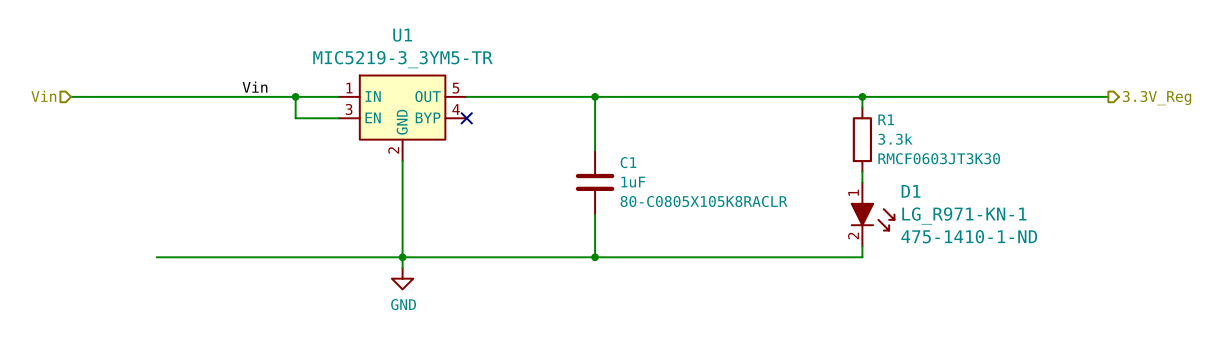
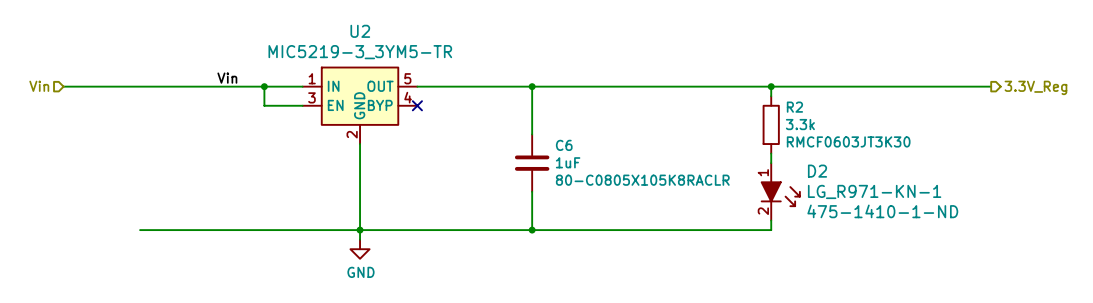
U1 name: U1 (402, 35) -> U2 (360, 31)
R1 name: R1 (886, 119) -> R2 (794, 107)
C1 name: C1 (628, 162) -> C6 (564, 145)
D1 name: D1 (911, 191) -> D2 (817, 171)

